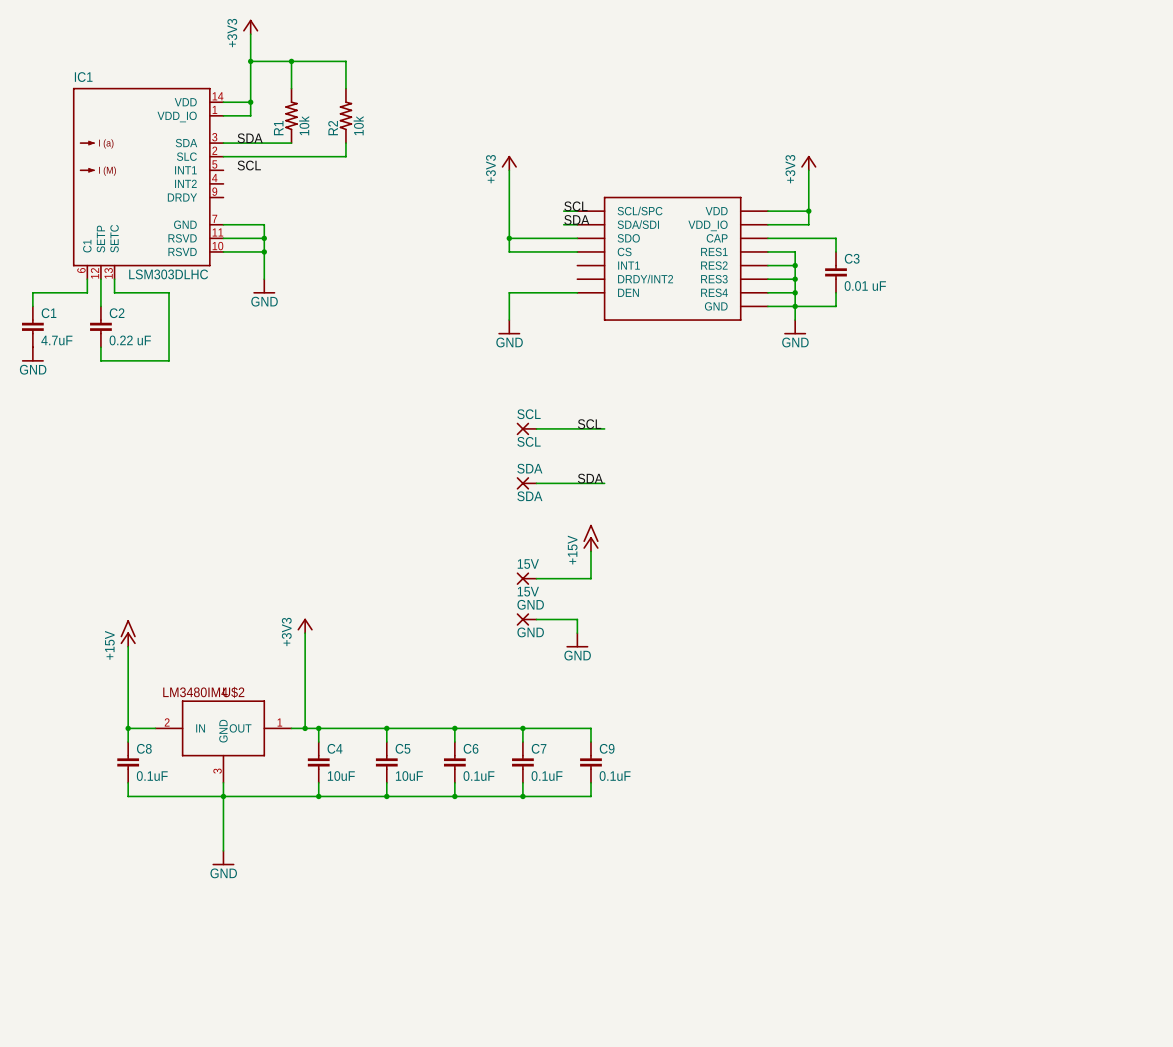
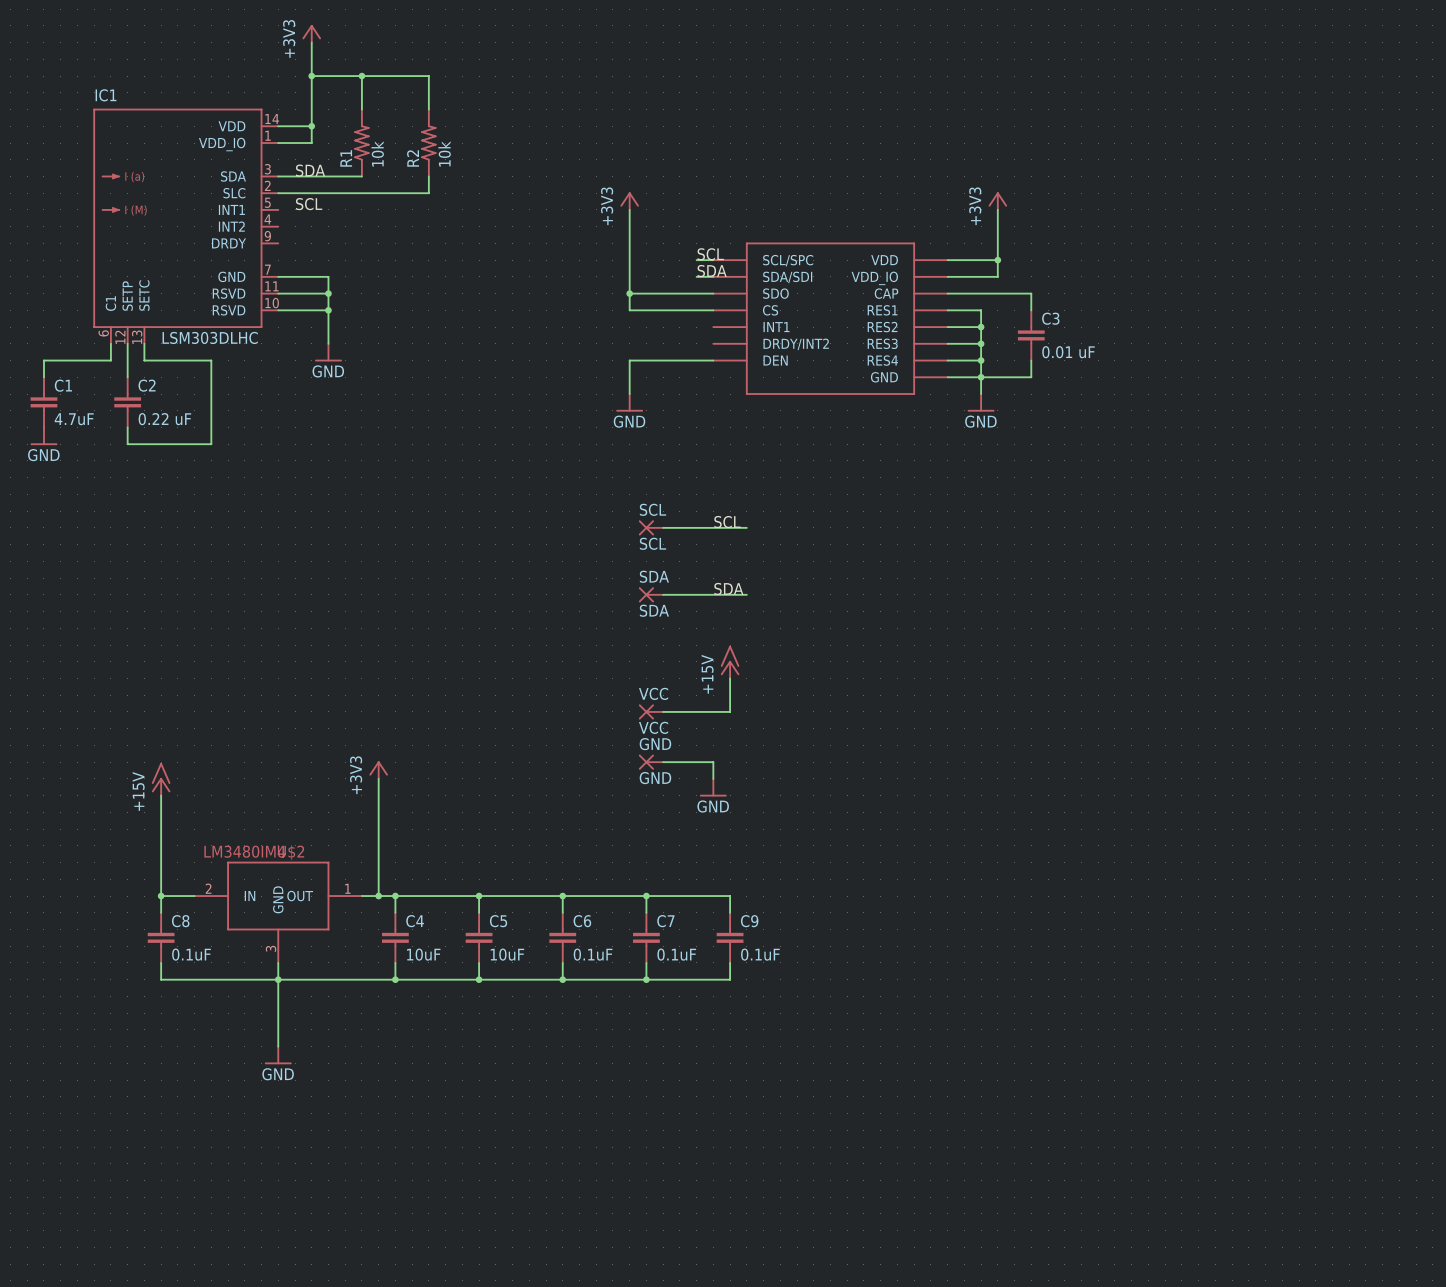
15V name: 15V (528, 564) -> VCC (653, 693)
15V value: 15V (528, 591) -> VCC (653, 727)

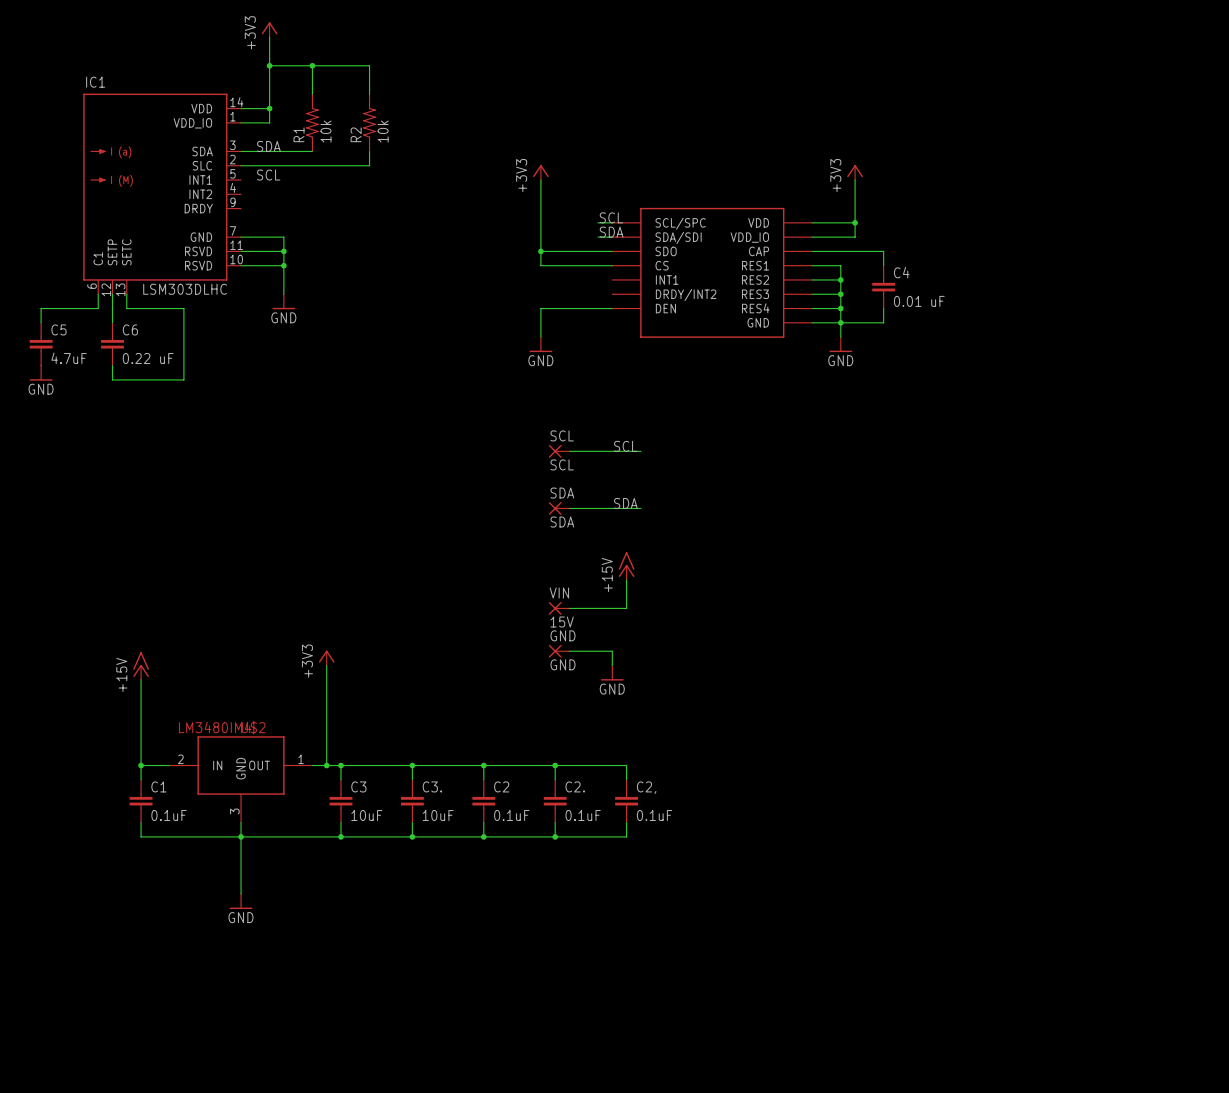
C3 name: C3 (1050, 318) -> C4 (901, 272)
C1 name: C1 (63, 385) -> C5 (58, 329)
C2 name: C2 (147, 385) -> C6 (130, 329)
VCC name: VCC (653, 693) -> VIN (559, 593)
VCC value: VCC (653, 727) -> 15V (562, 621)
C8 name: C8 (180, 921) -> C1 (158, 786)
C4 name: C4 (415, 921) -> C3 (358, 786)
C5 name: C5 (498, 921) -> C3. (432, 786)
C6 name: C6 (582, 921) -> C2 (501, 786)
C7 name: C7 (665, 921) -> C2. (575, 786)
C9 name: C9 (749, 921) -> C2, (646, 787)

